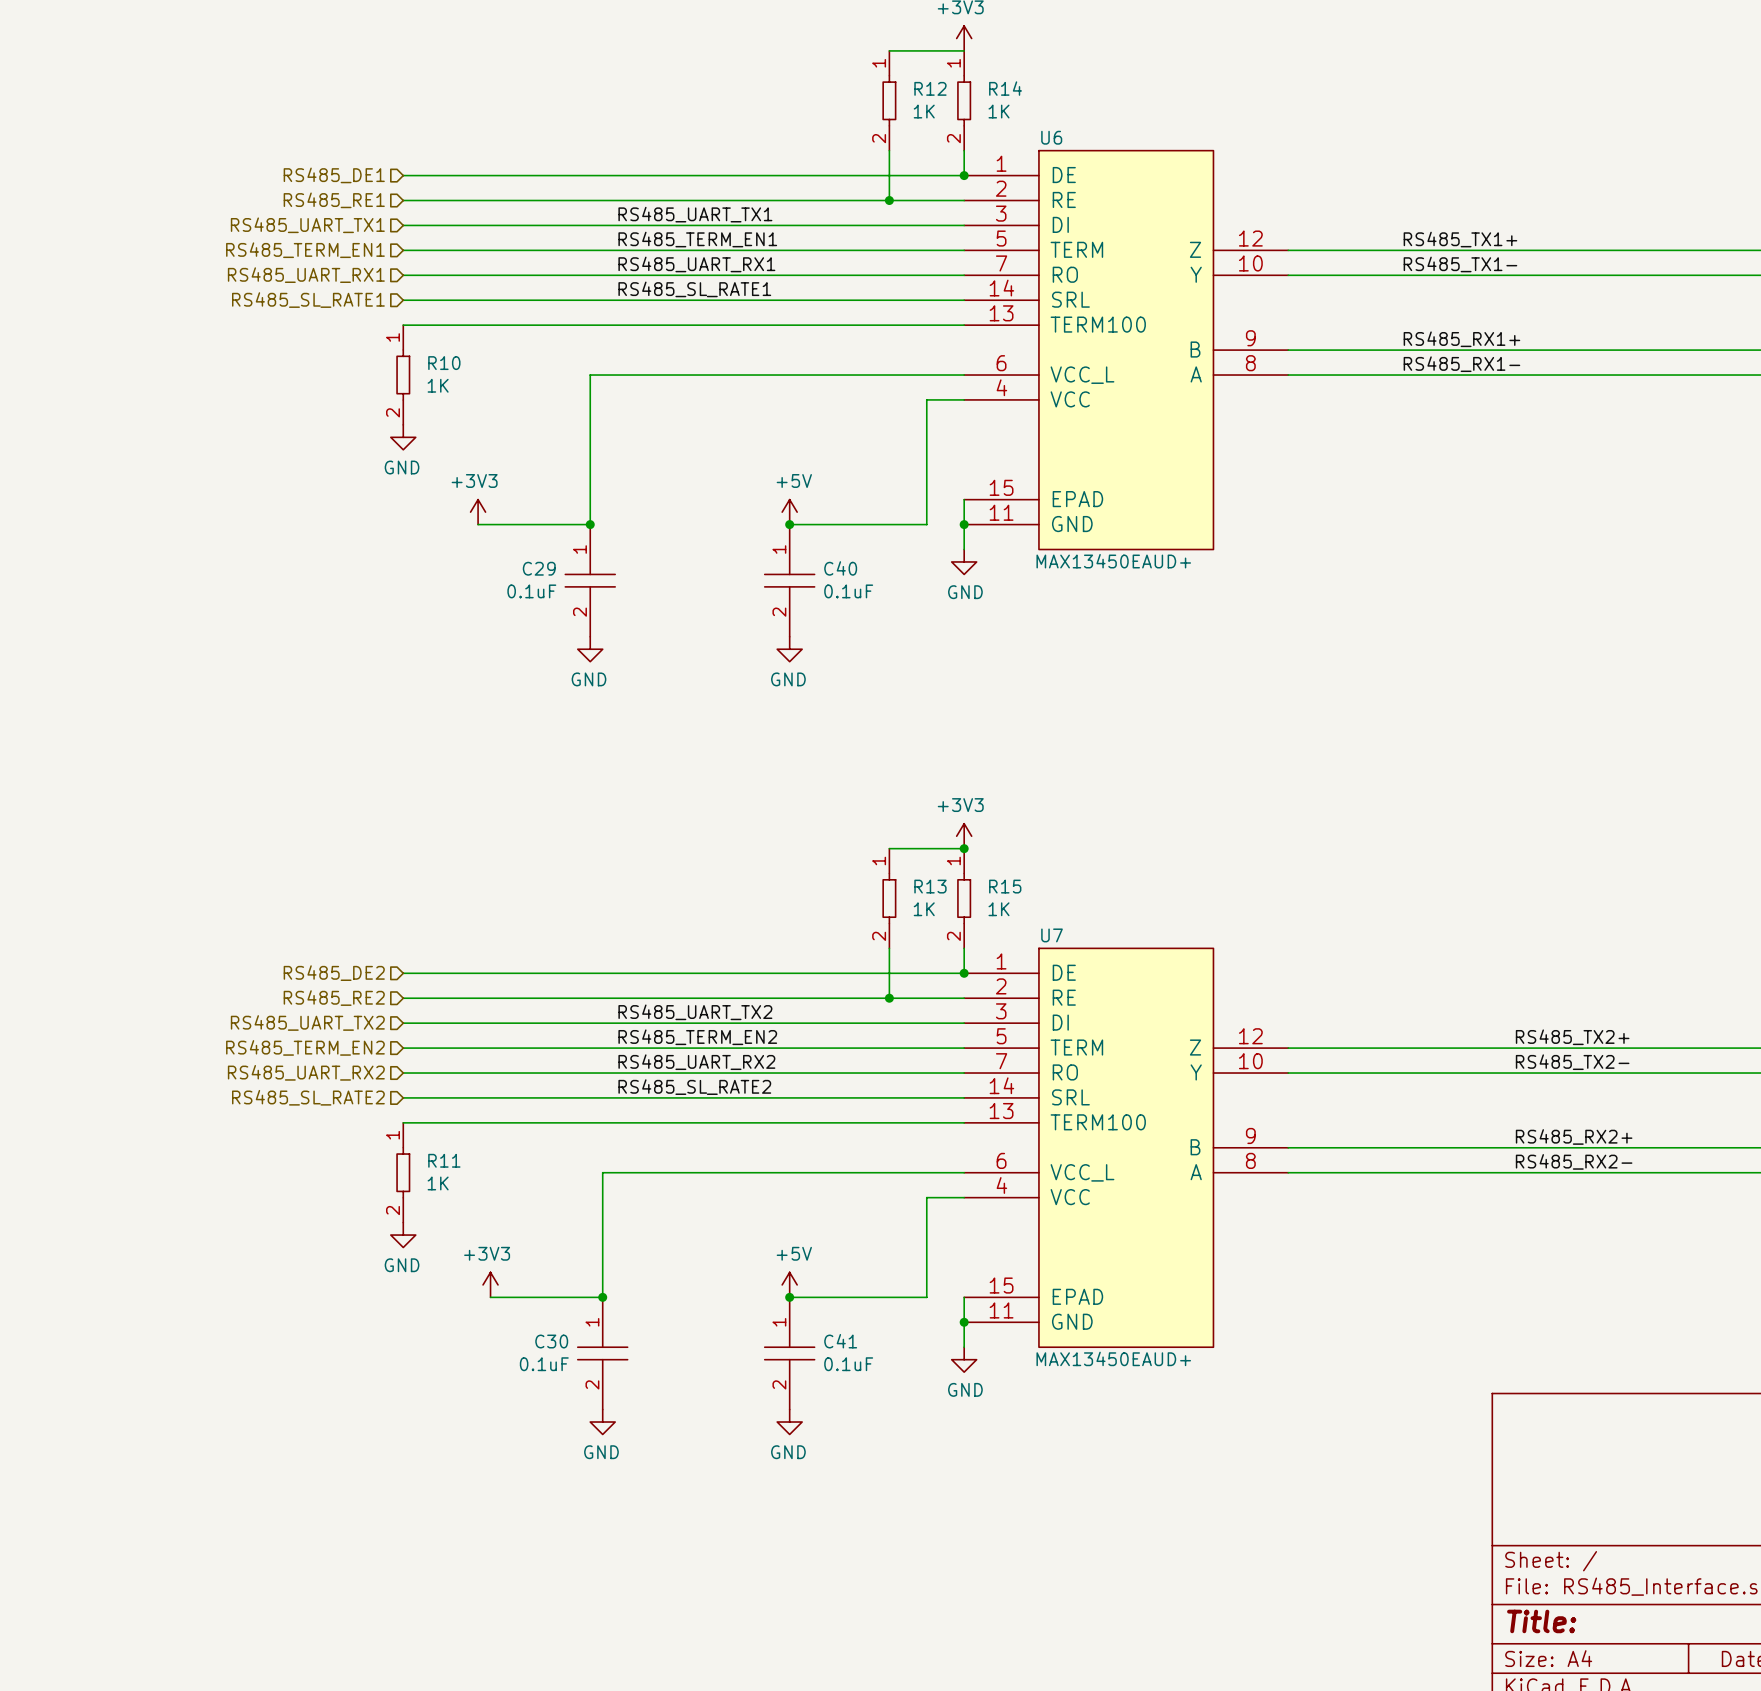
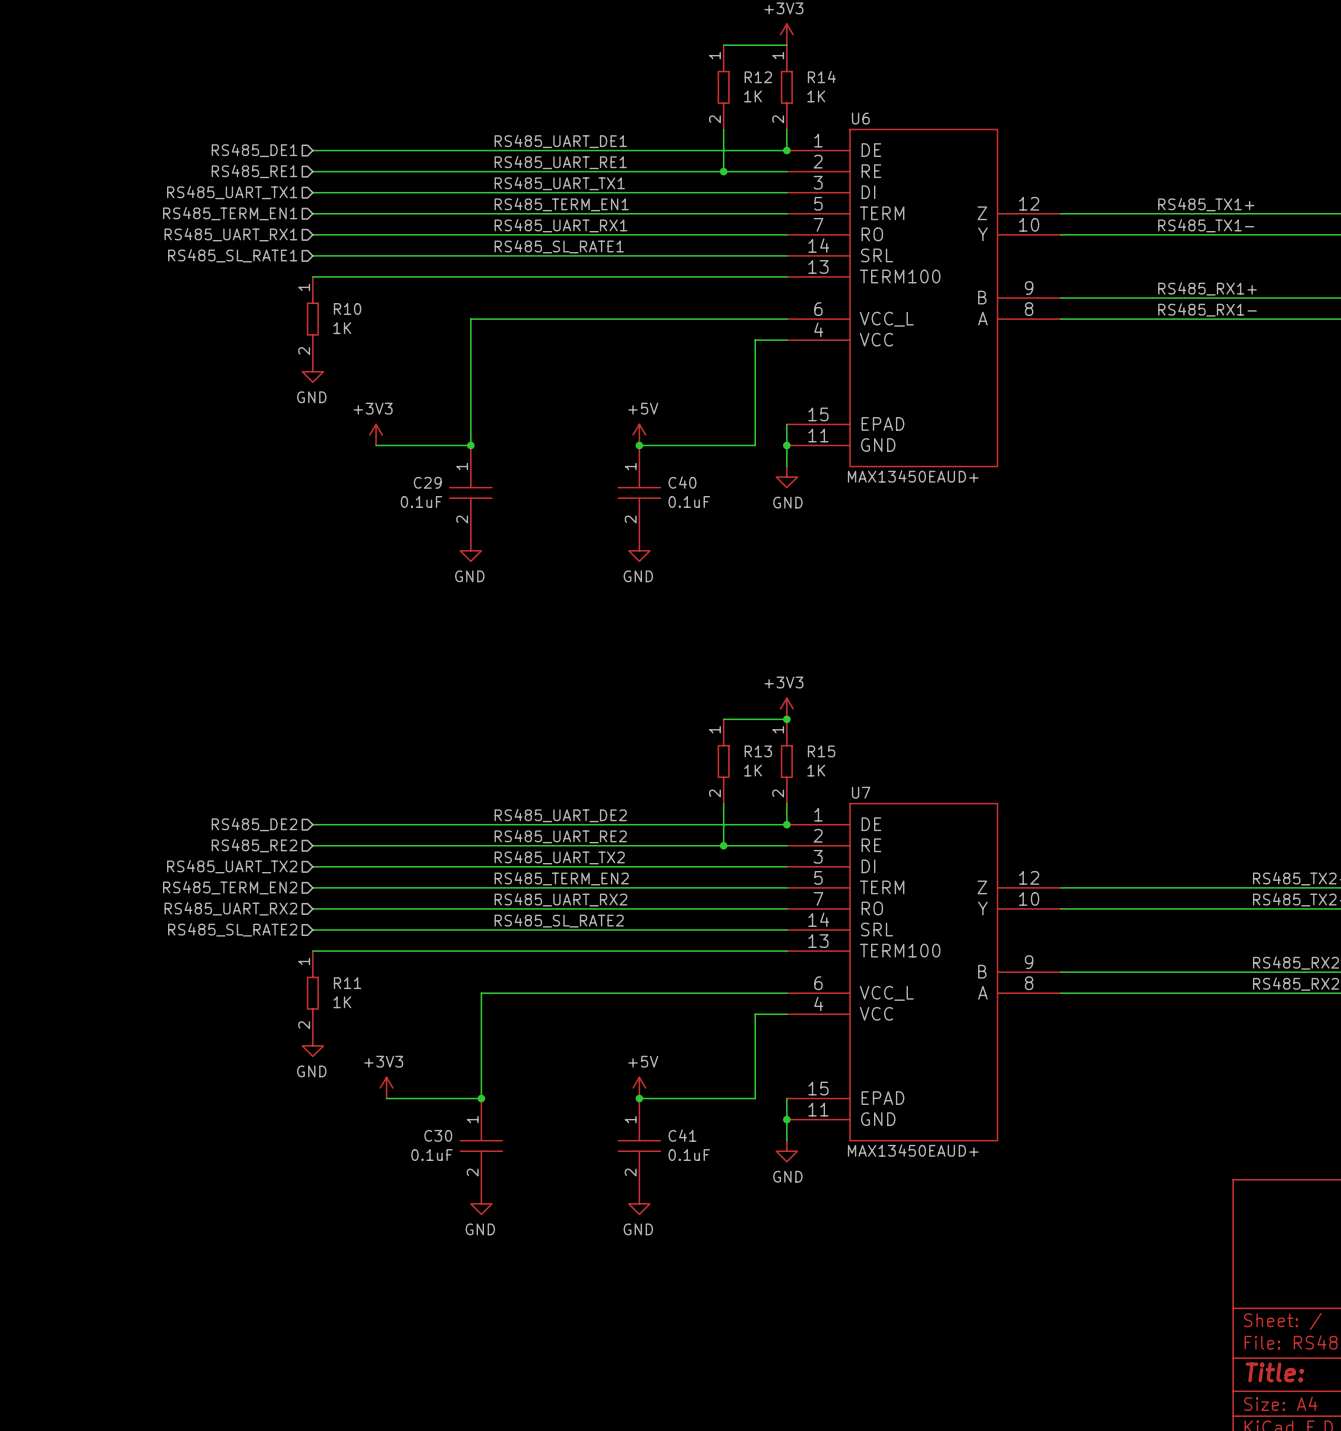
label: none -> RS485_UART_DE1 (560, 141)
label: none -> RS485_UART_RE1 (560, 162)
label: none -> RS485_UART_DE2 (560, 815)
label: none -> RS485_UART_RE2 (560, 836)

